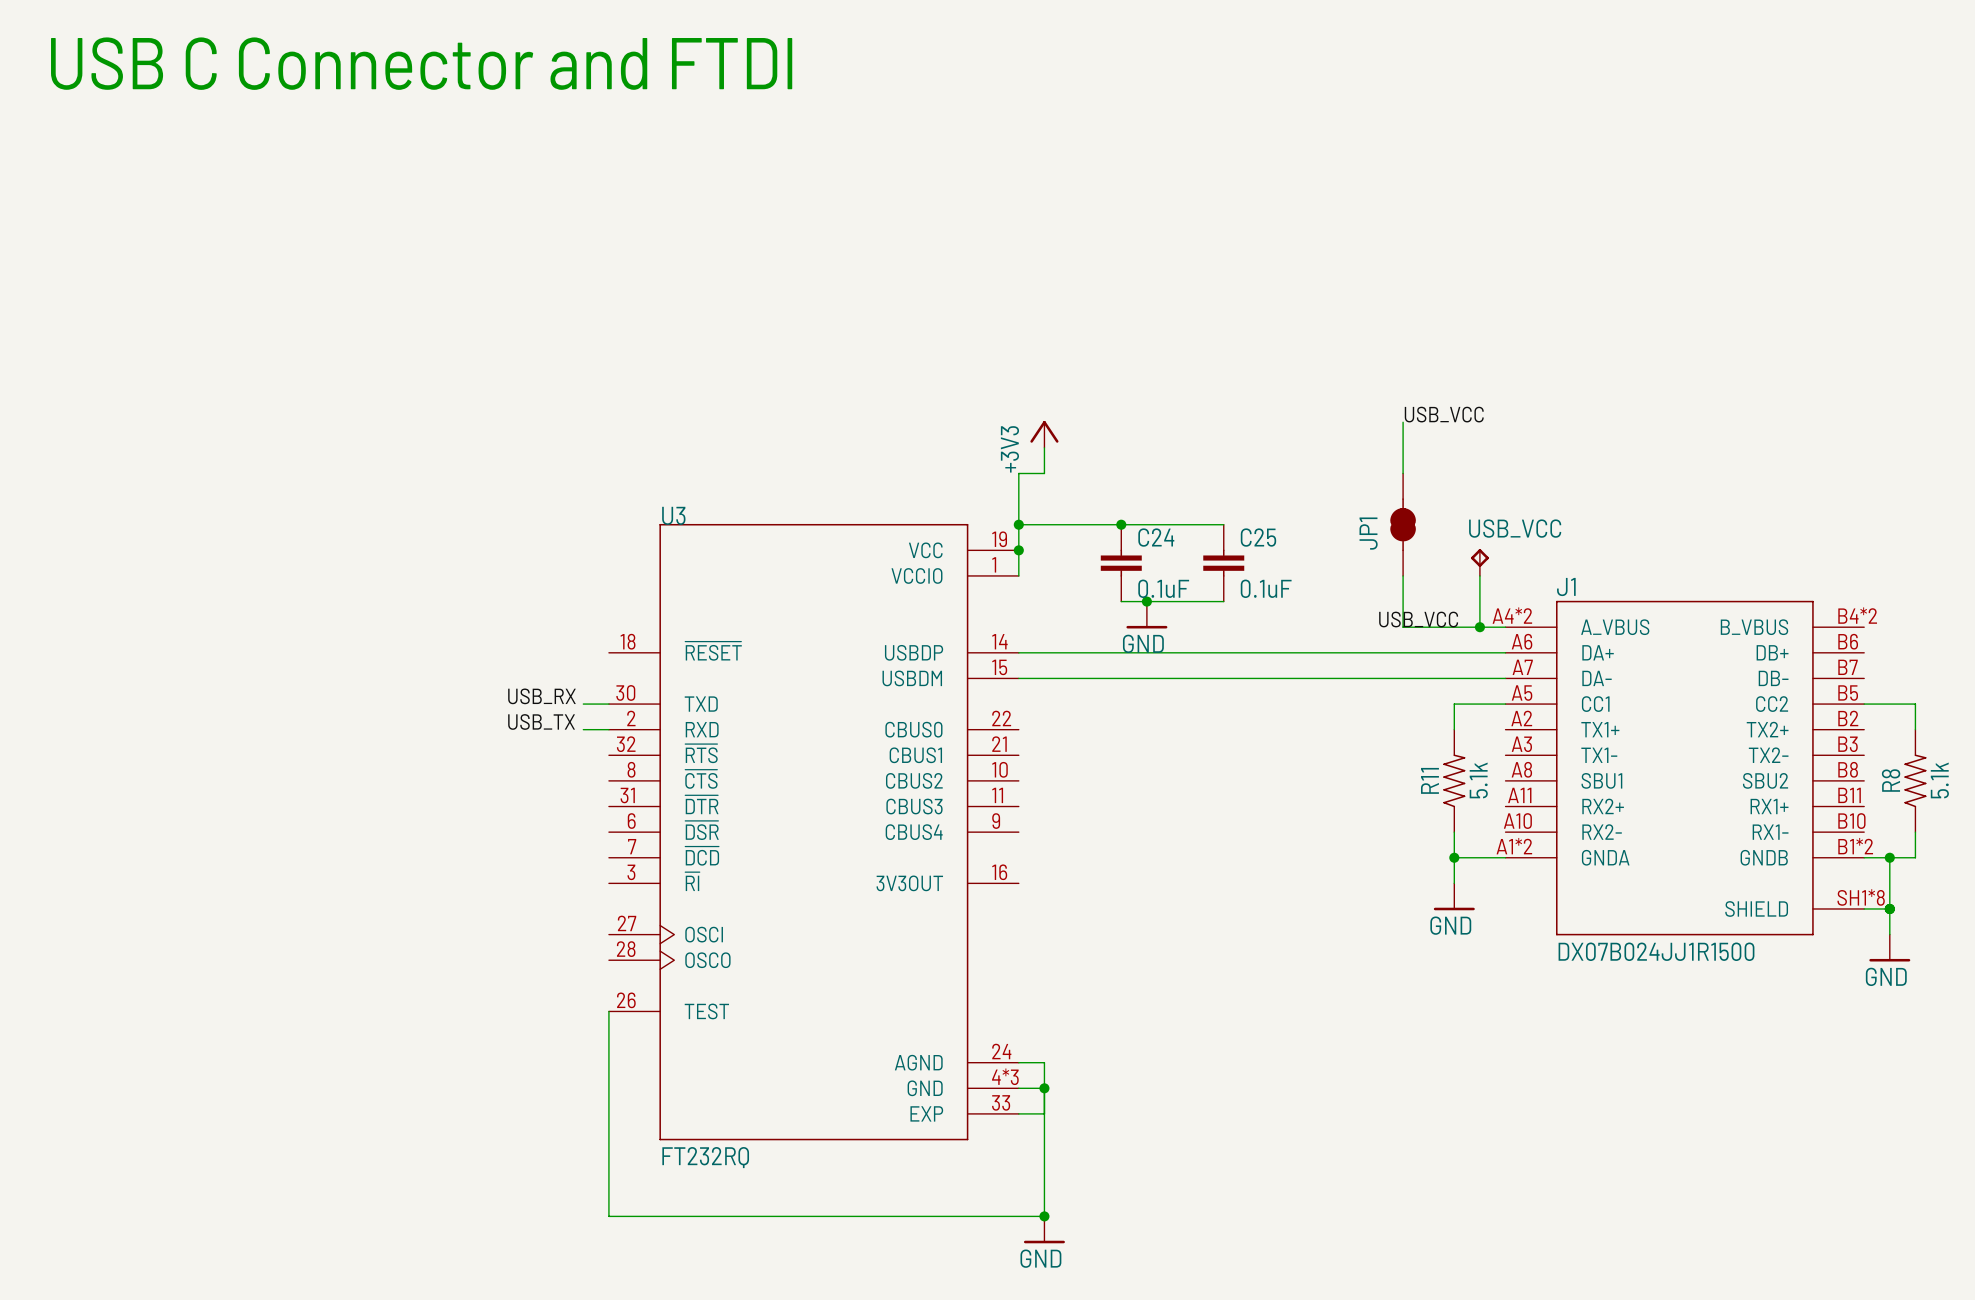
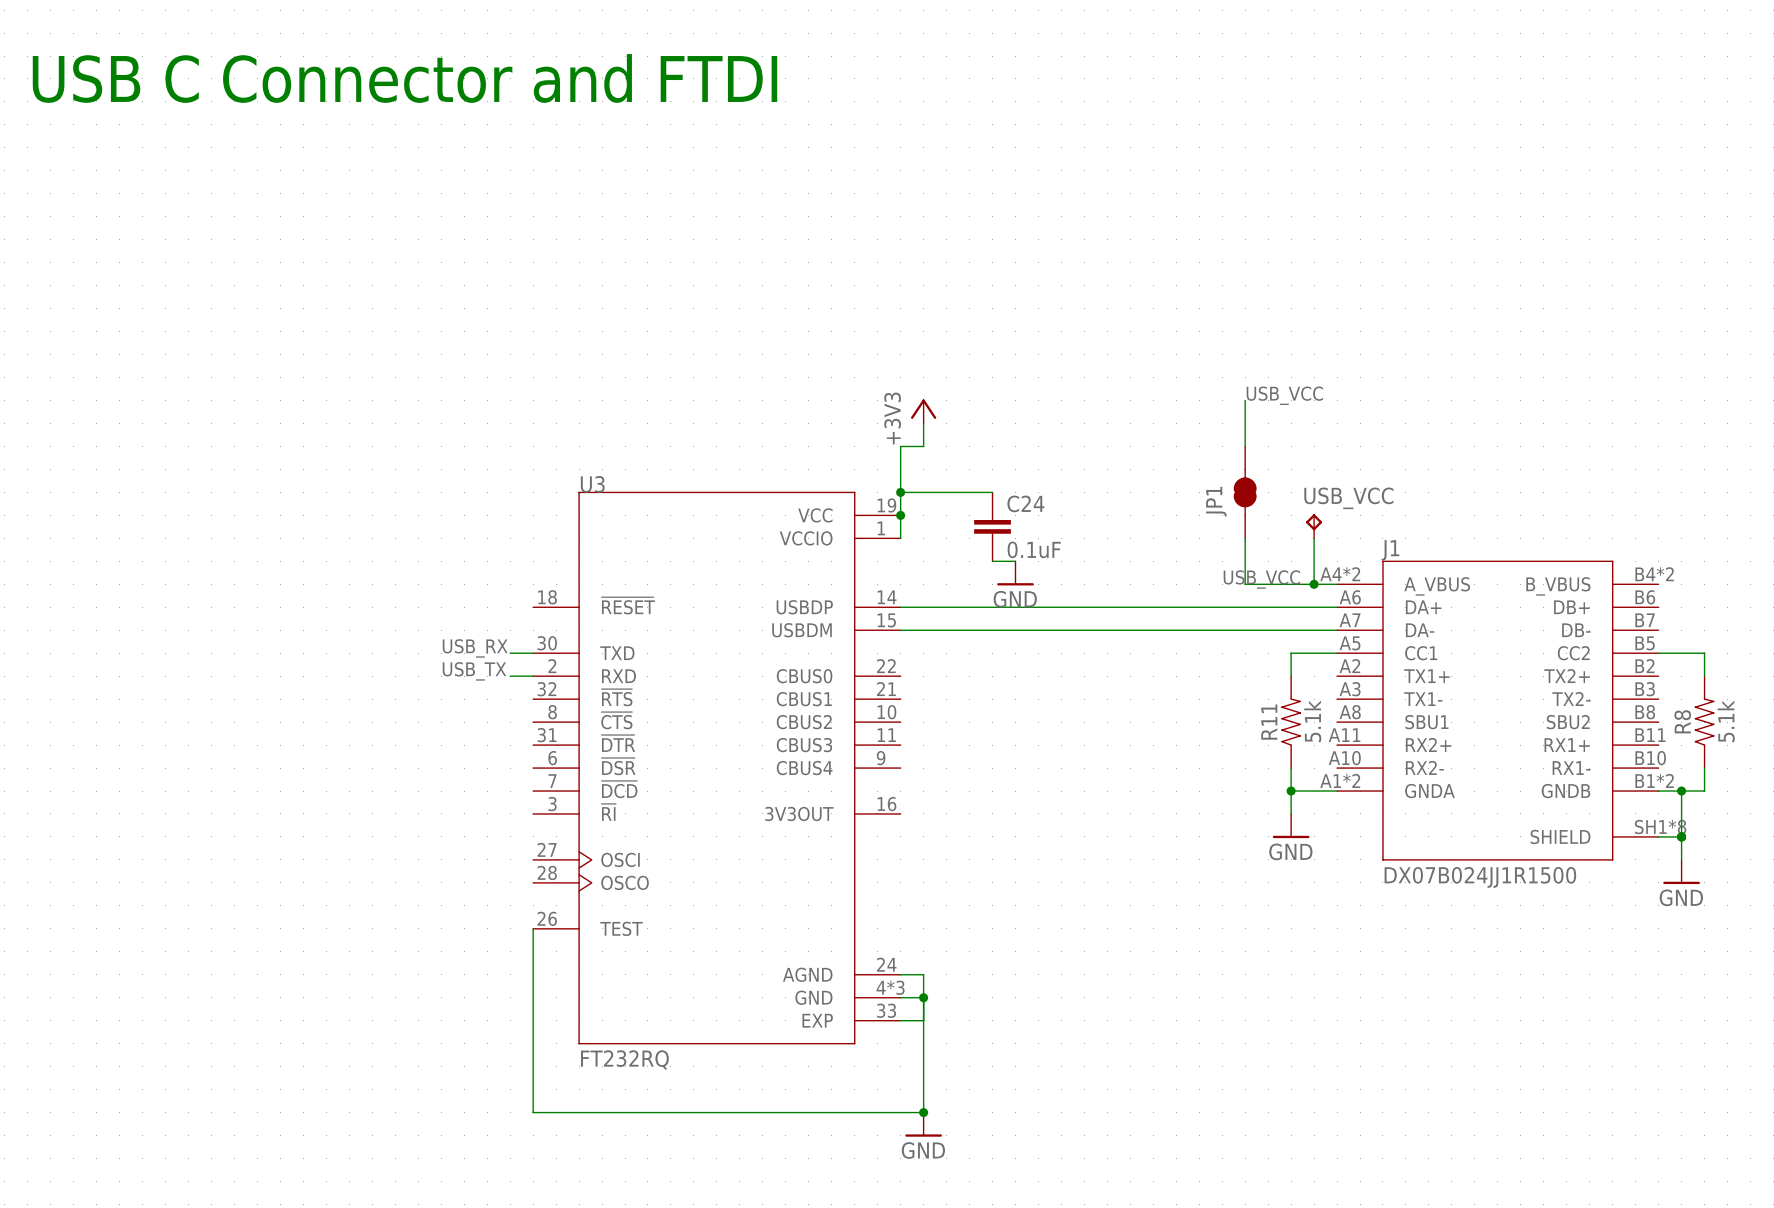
wire: (1121, 524) (1223, 524) -> none
junction: (1121, 524) -> none
C25: 0.1uF (1223, 563) -> none
wire: (1146, 601) (1223, 601) -> none
junction: (1146, 601) -> none

